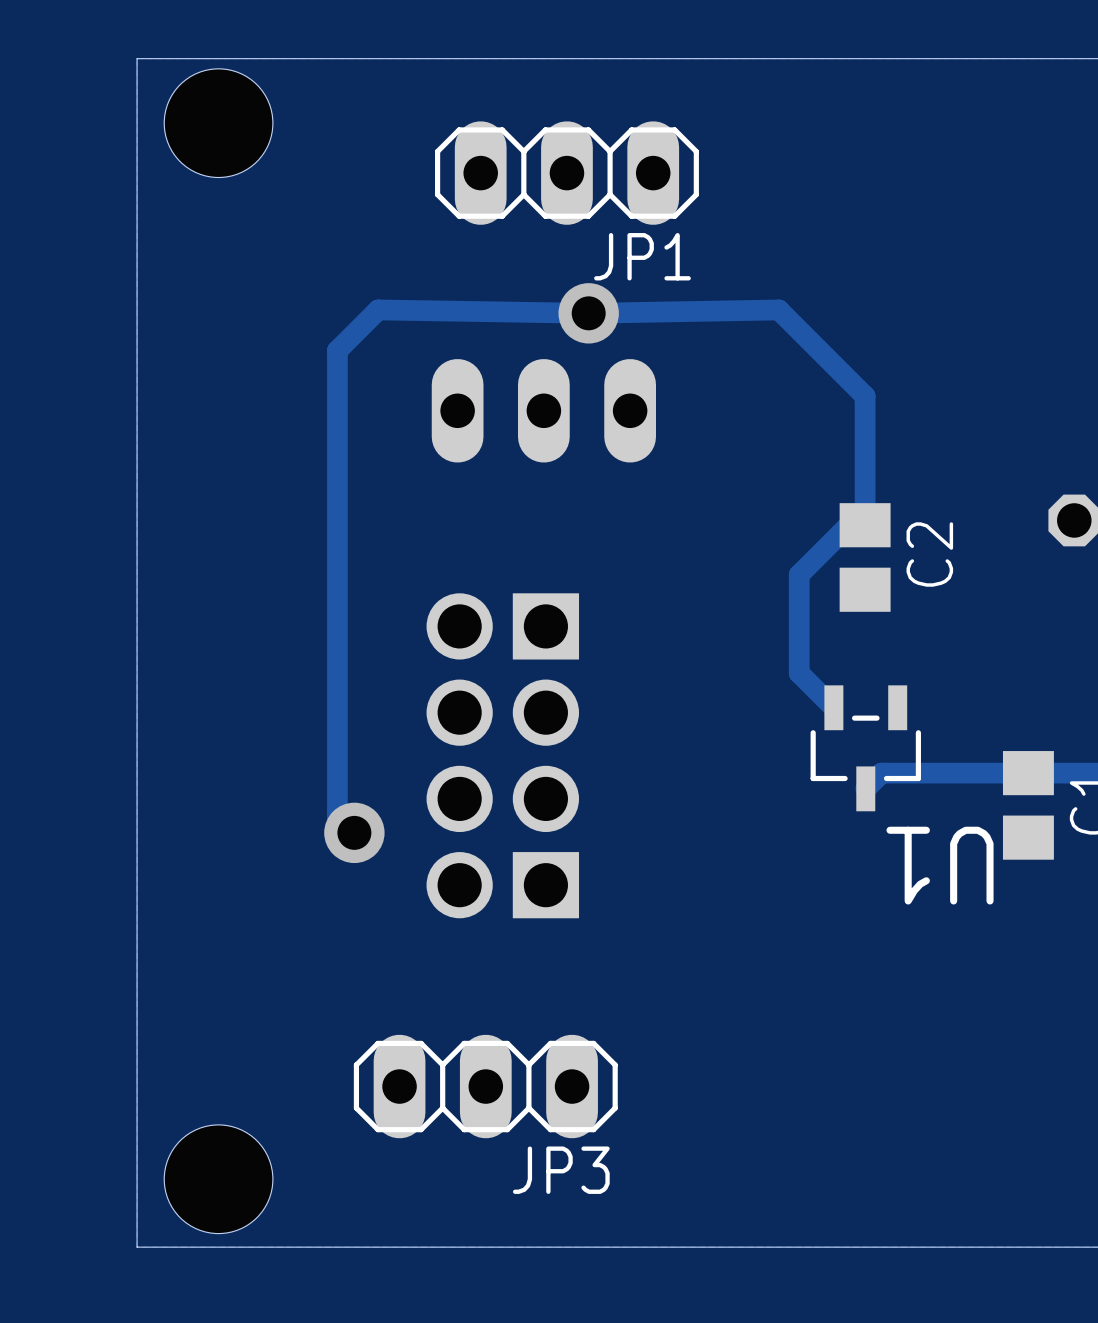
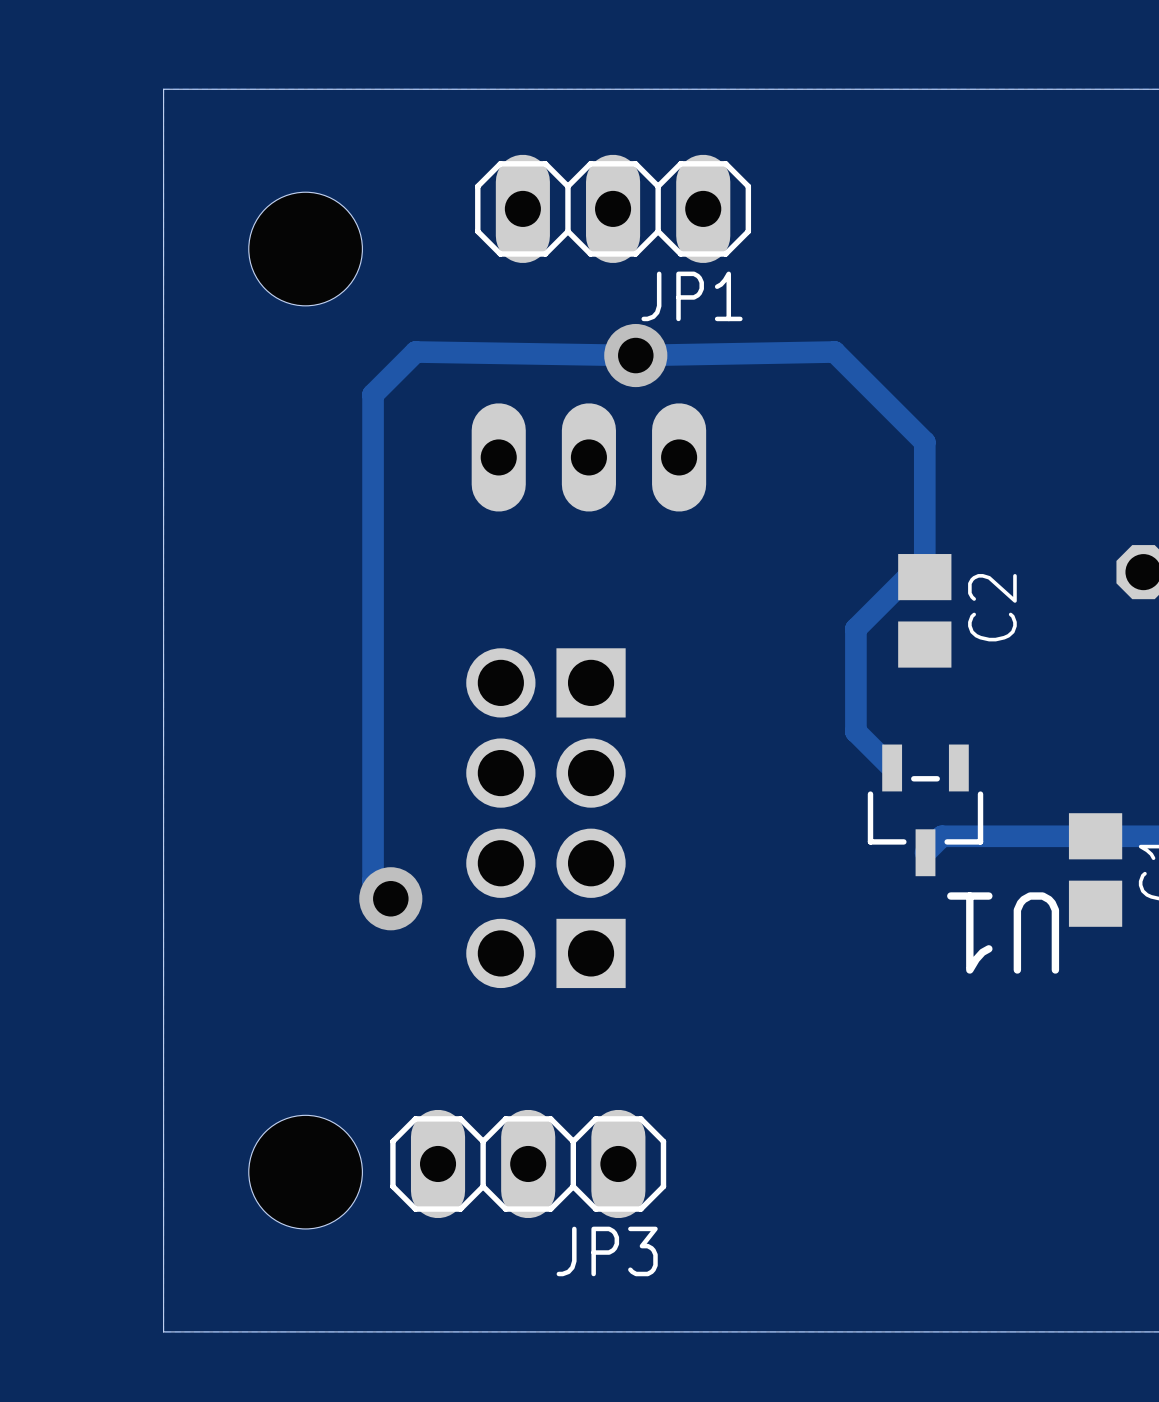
hole position: (218, 123) -> (305, 249)
hole position: (218, 1179) -> (305, 1172)

